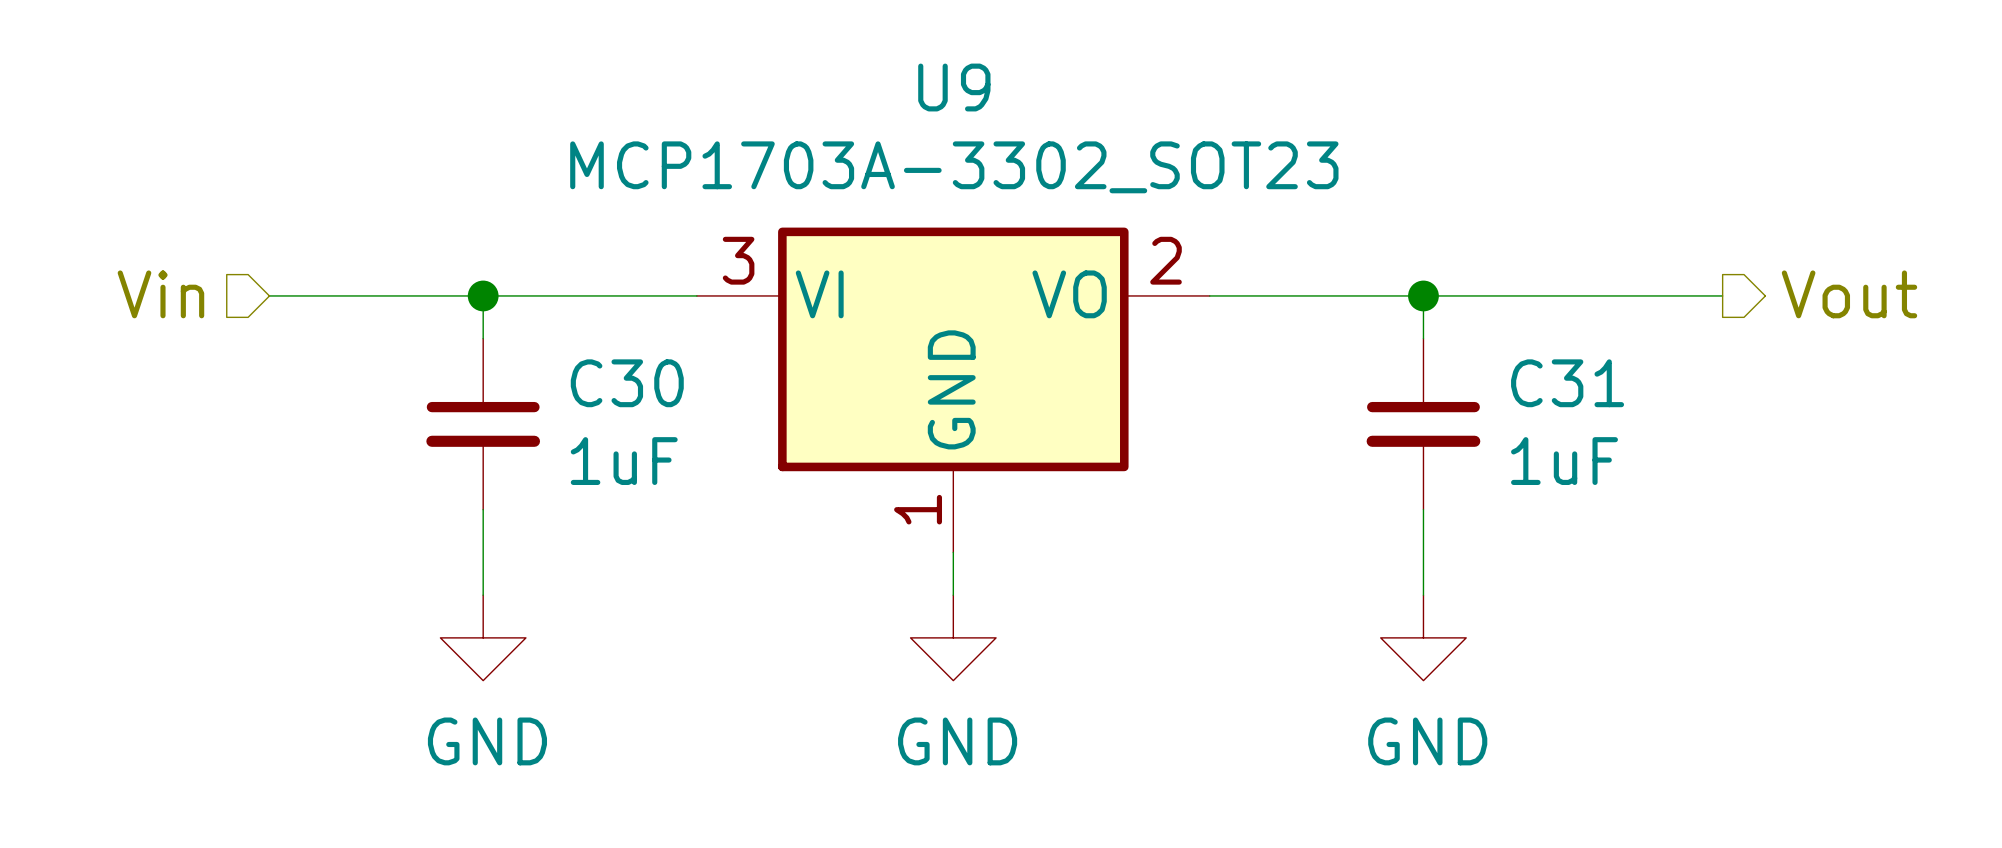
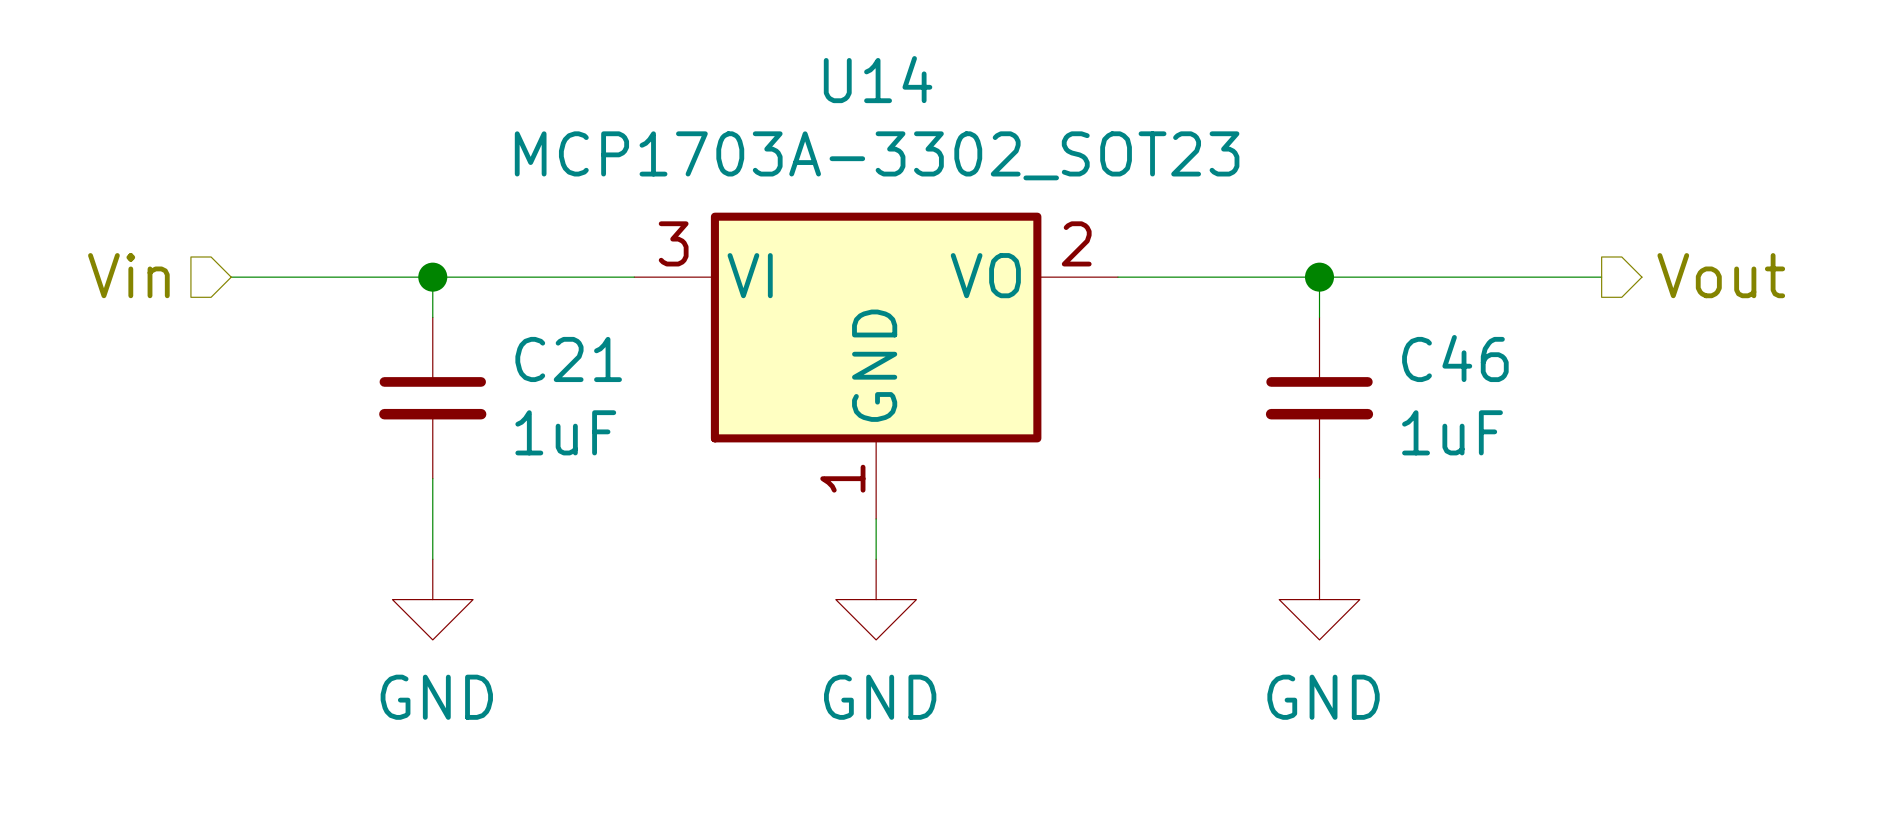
U9 name: U9 (954, 87) -> U14 (878, 79)
C30 name: C30 (627, 383) -> C21 (568, 359)
C31 name: C31 (1567, 383) -> C46 (1455, 358)

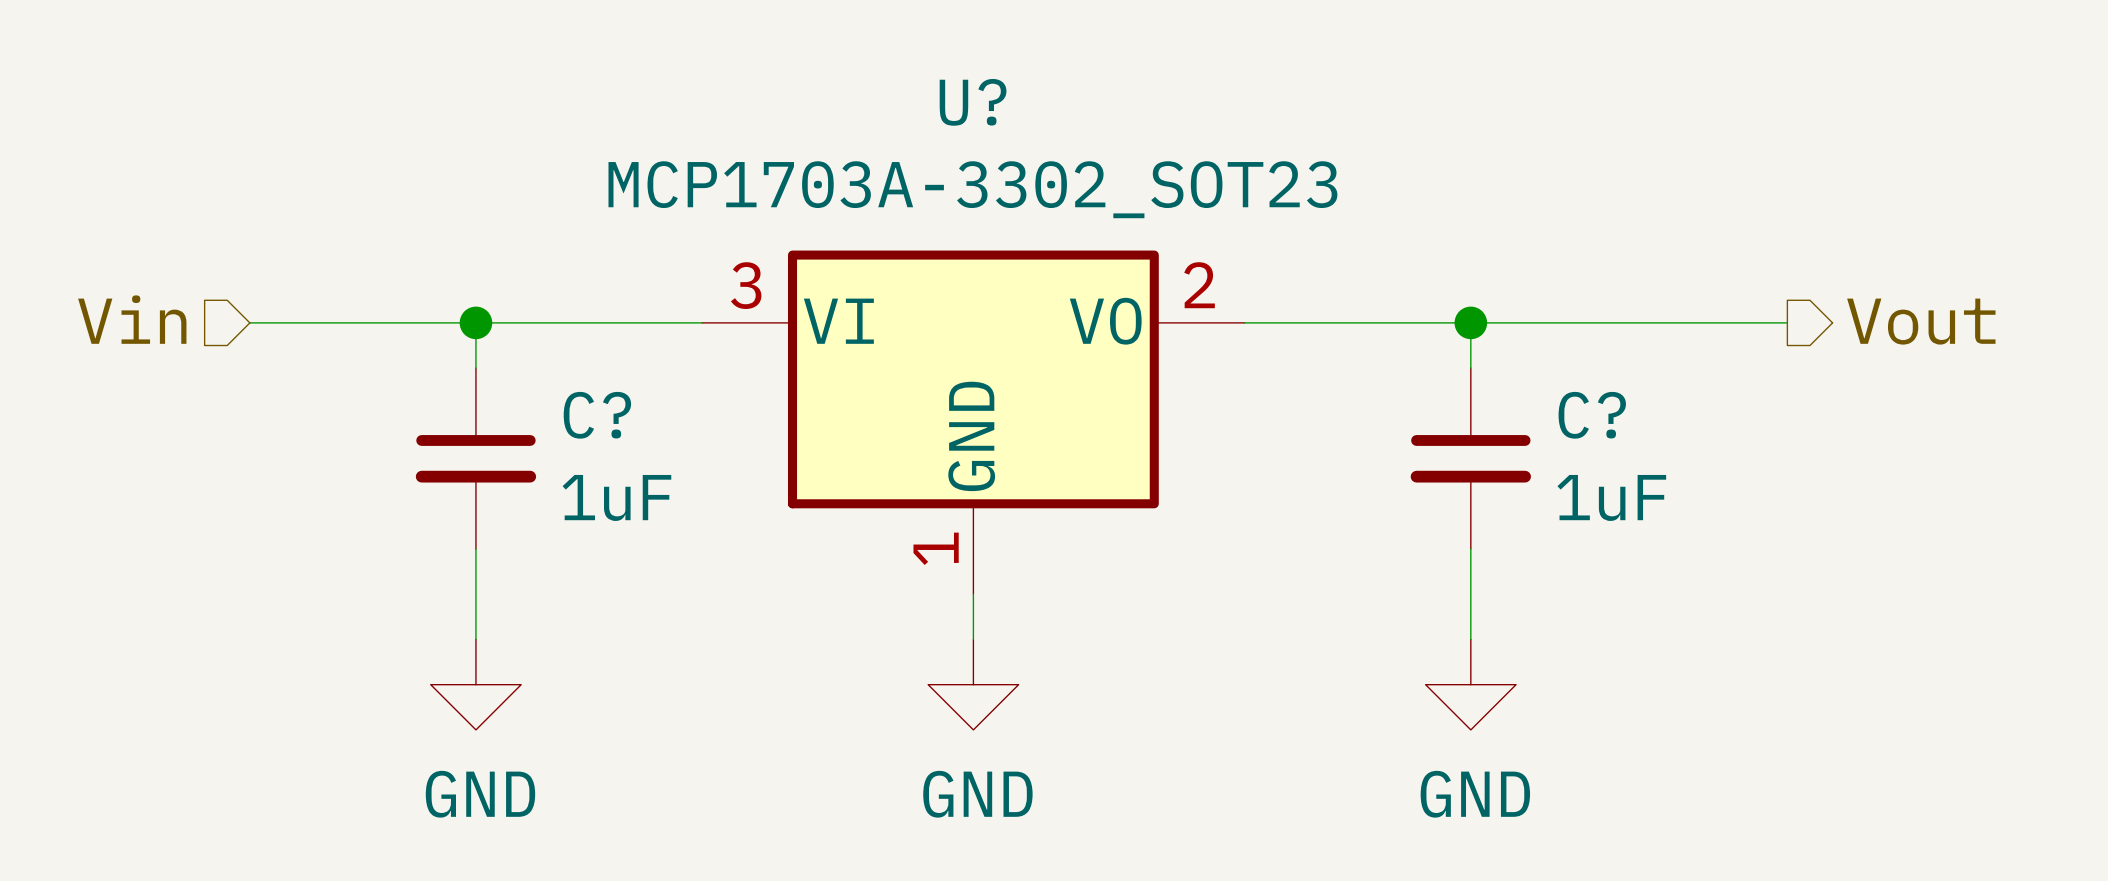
U14 name: U14 (878, 79) -> U? (973, 102)
C46 name: C46 (1455, 358) -> C? (1592, 415)
C21 name: C21 (568, 359) -> C? (597, 415)

